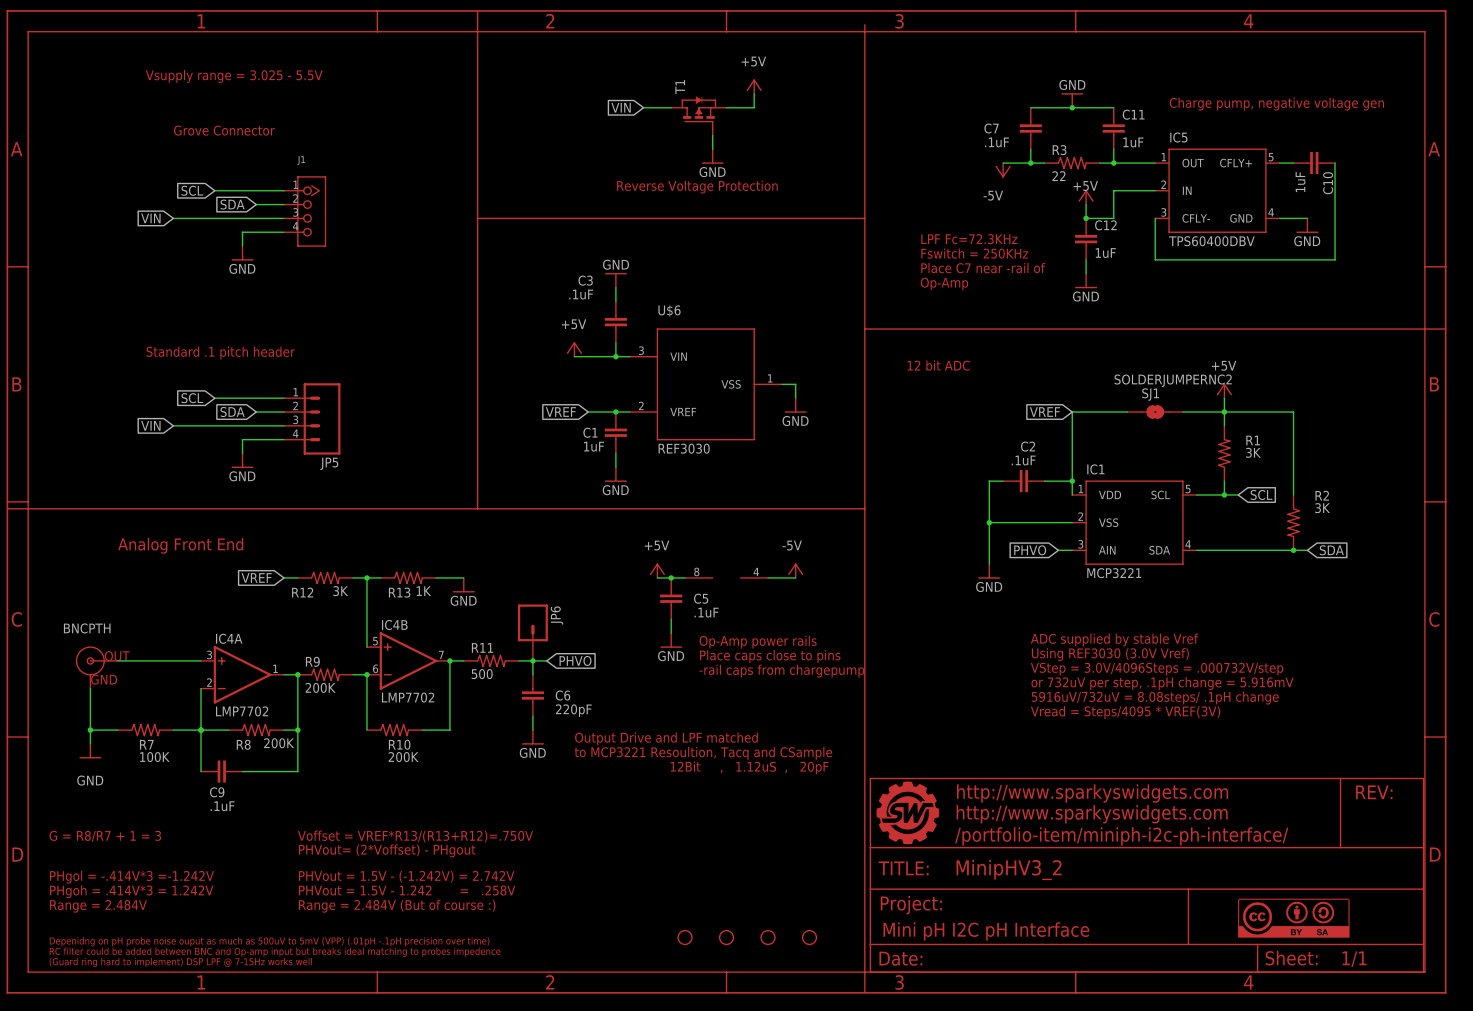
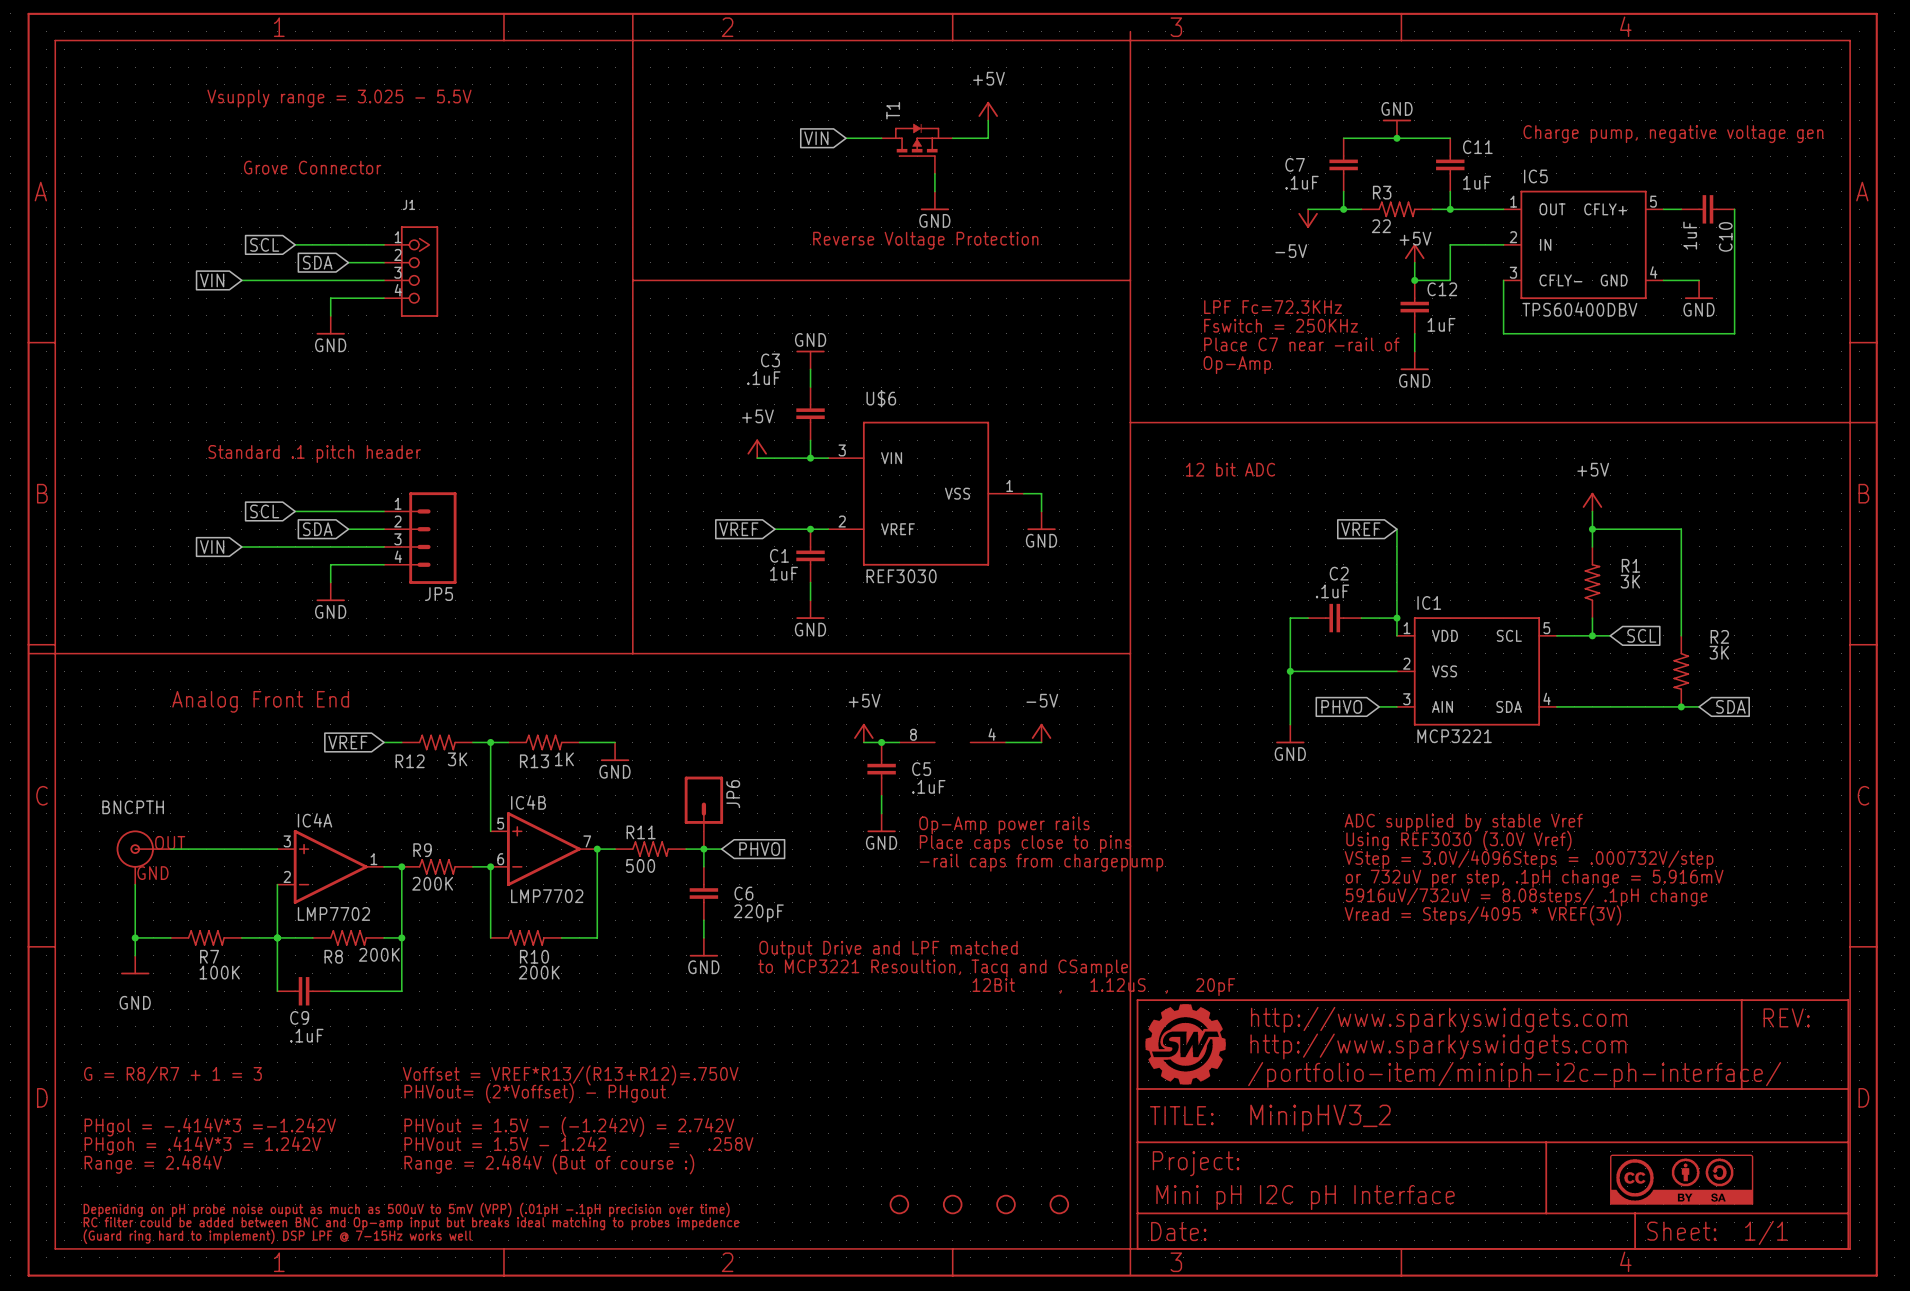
wire: (1072, 412) (1127, 412) -> none
SJ1: SOLDERJUMPERNC2 (1155, 412) -> none
wire: (1182, 412) (1224, 412) -> none

